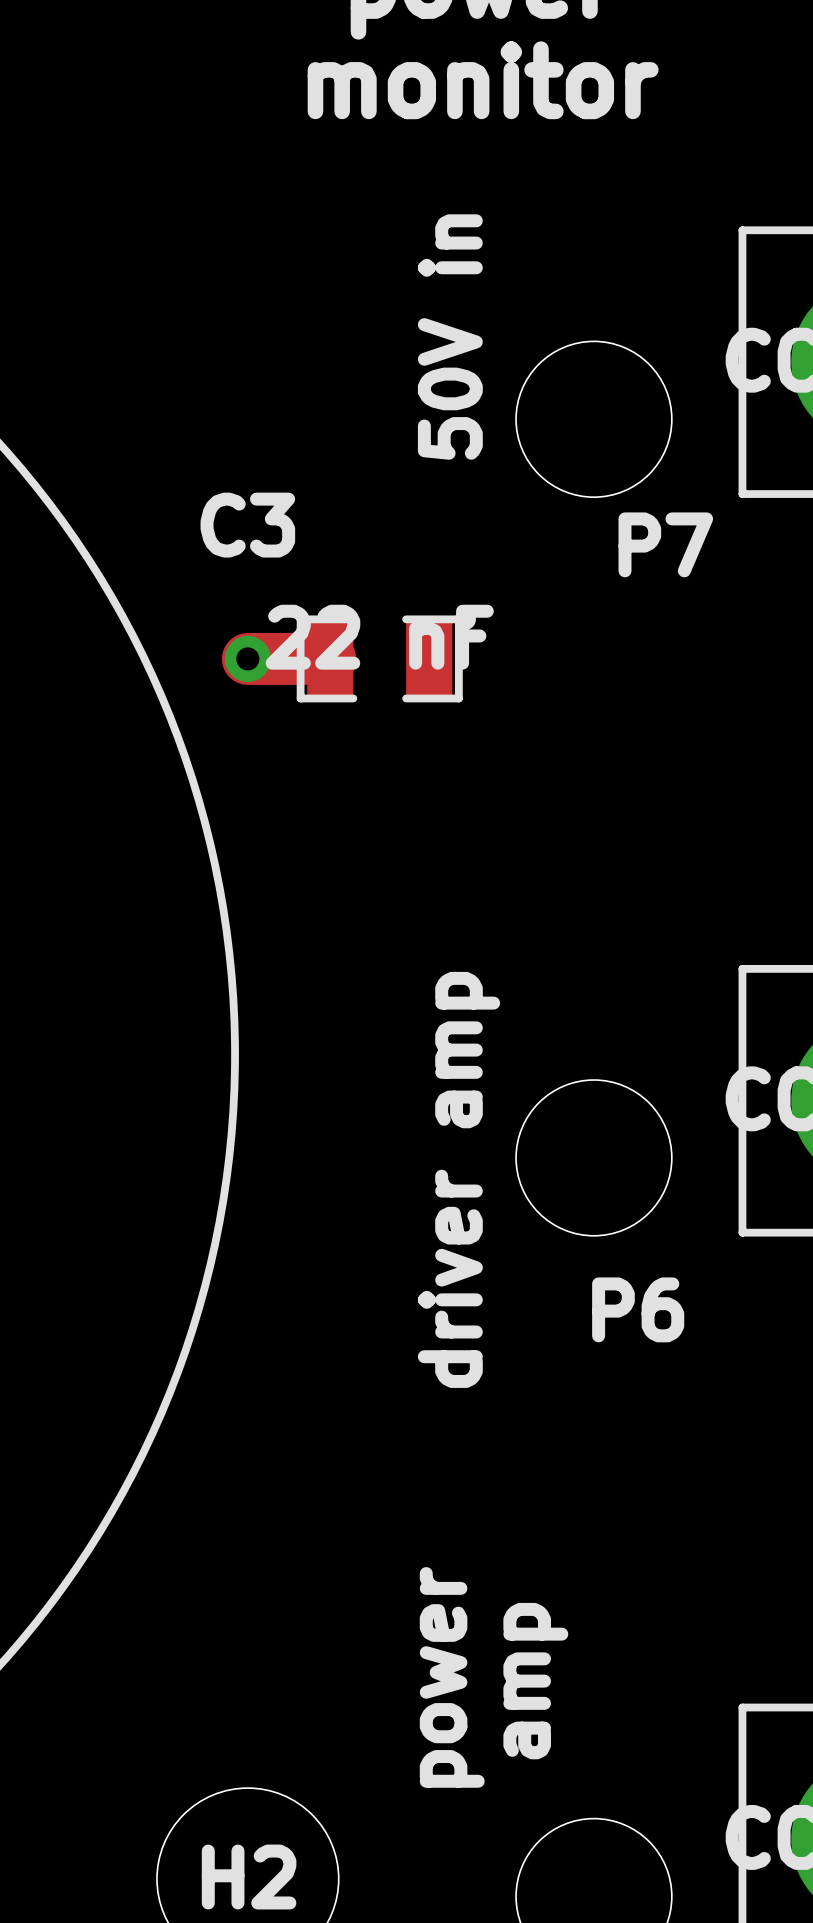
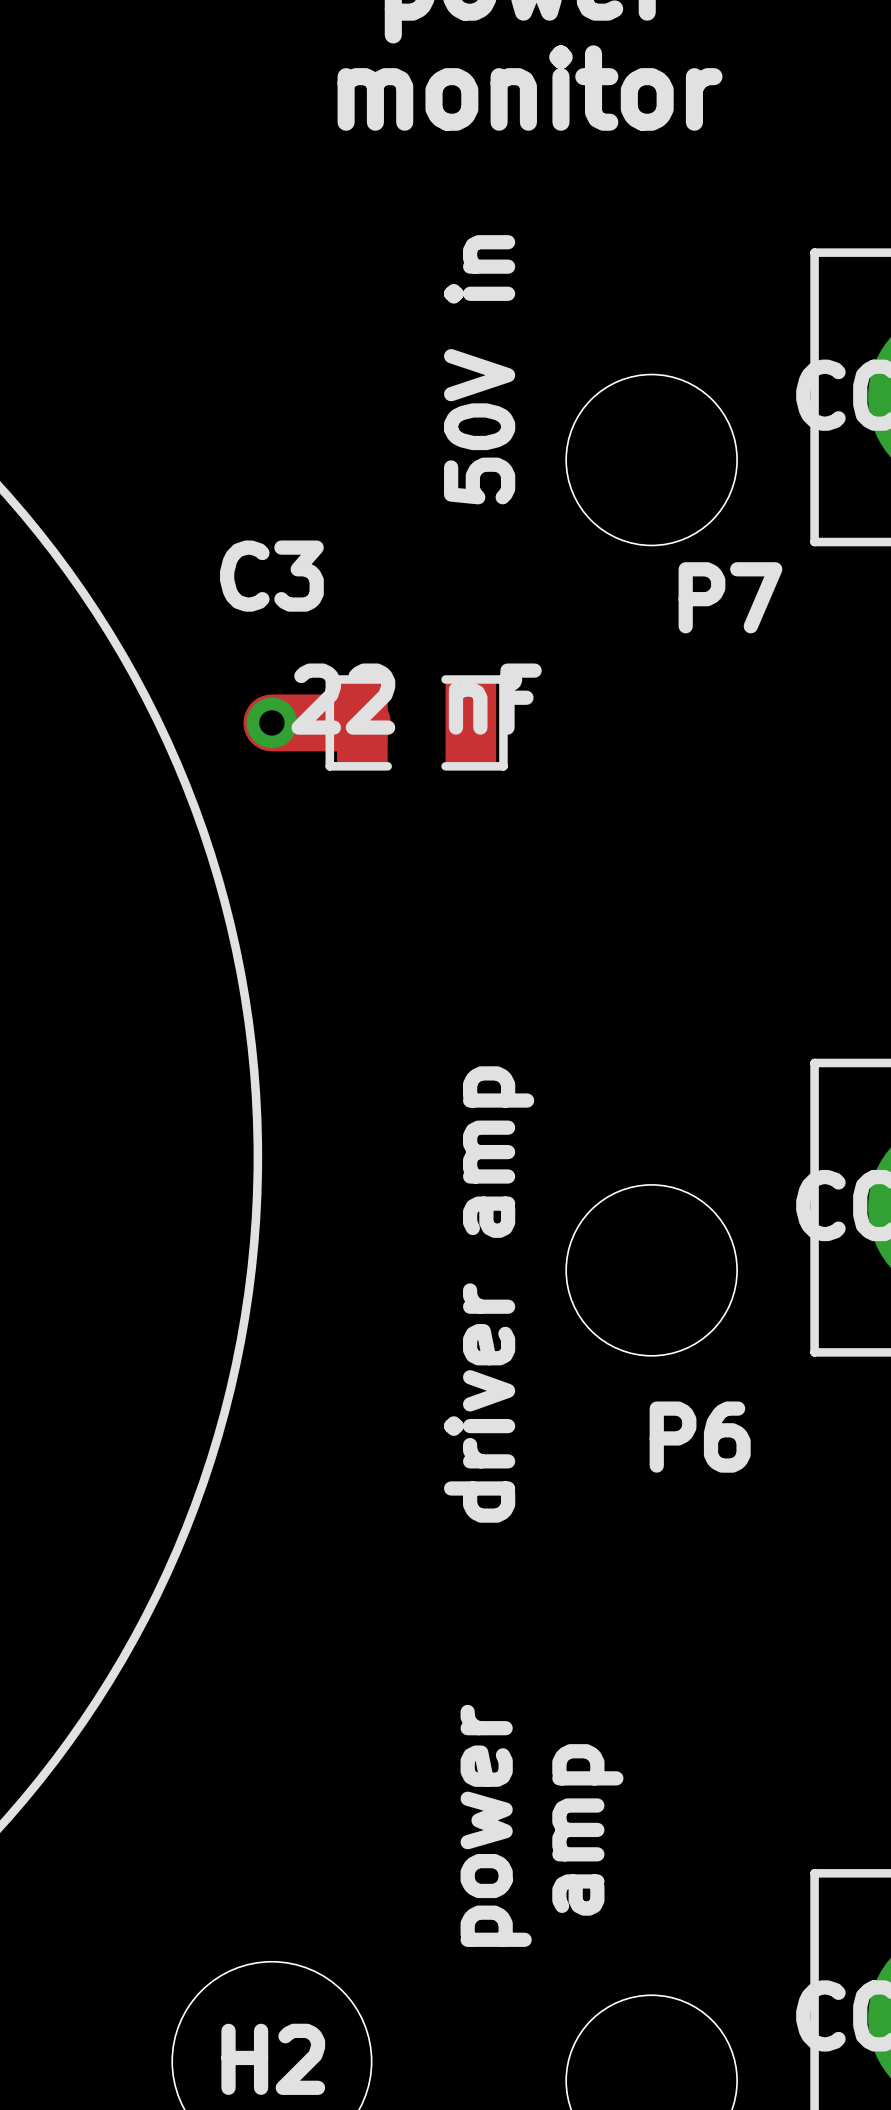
text position: 50V in (450, 337) -> 50V in (479, 369)
text position: driver amp (459, 1179) -> driver amp (489, 1294)
text position: power (452, 1677) -> power (496, 1825)
text position: amp (535, 1681) -> amp (587, 1829)

